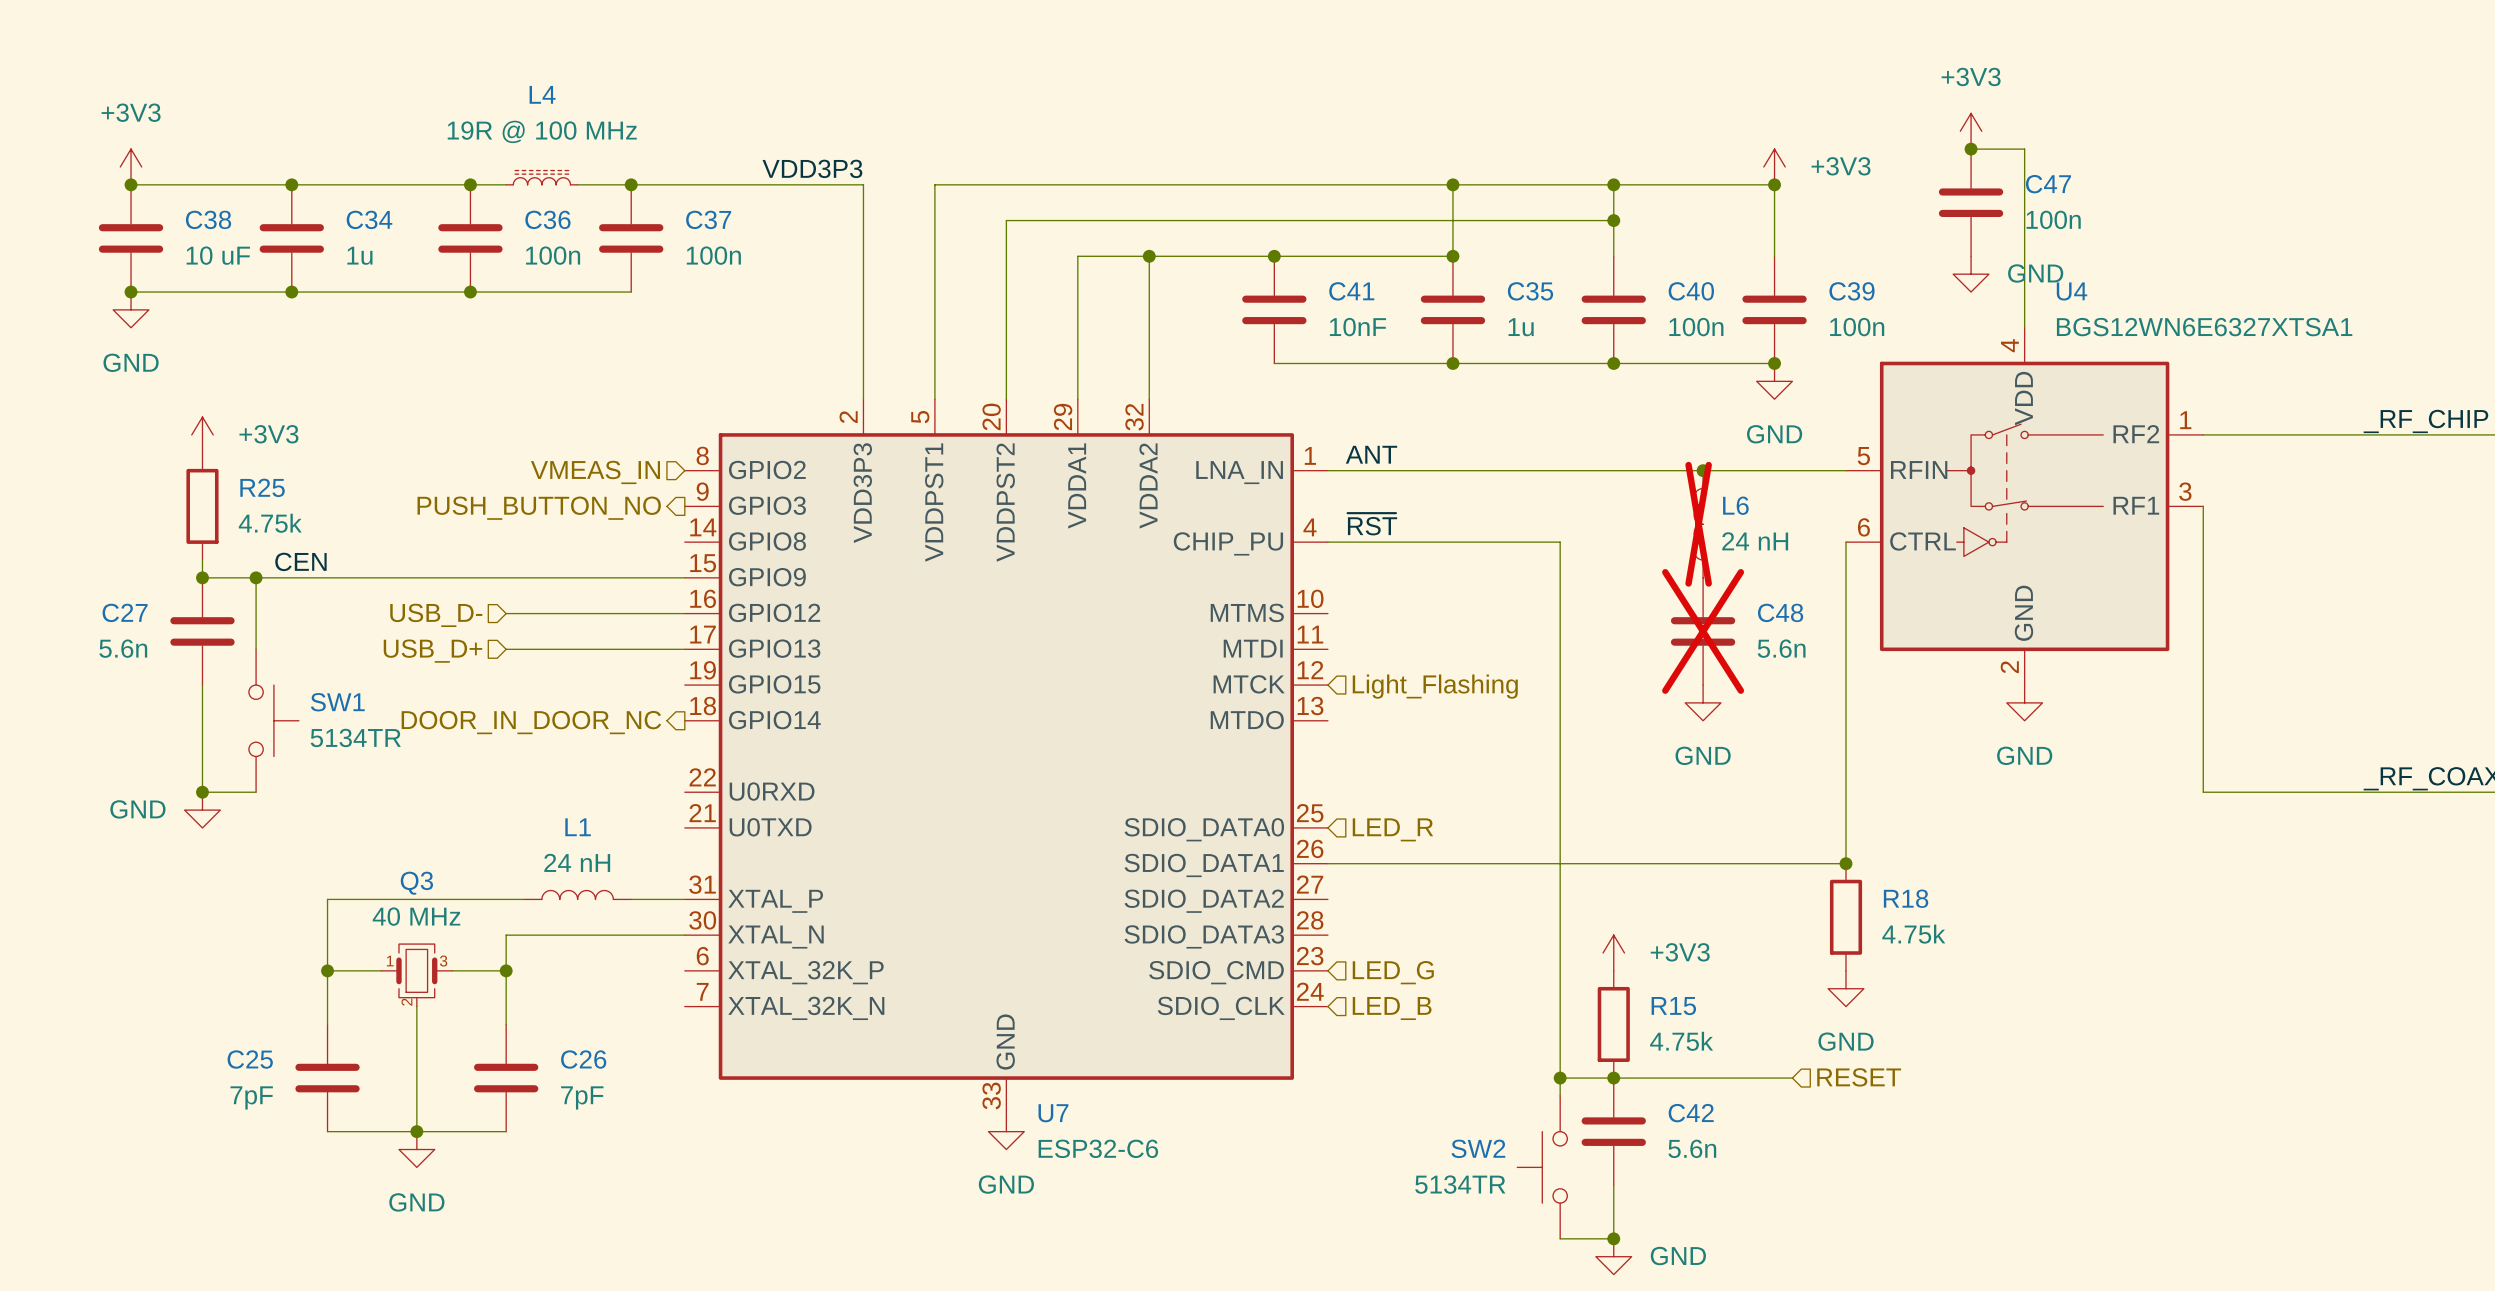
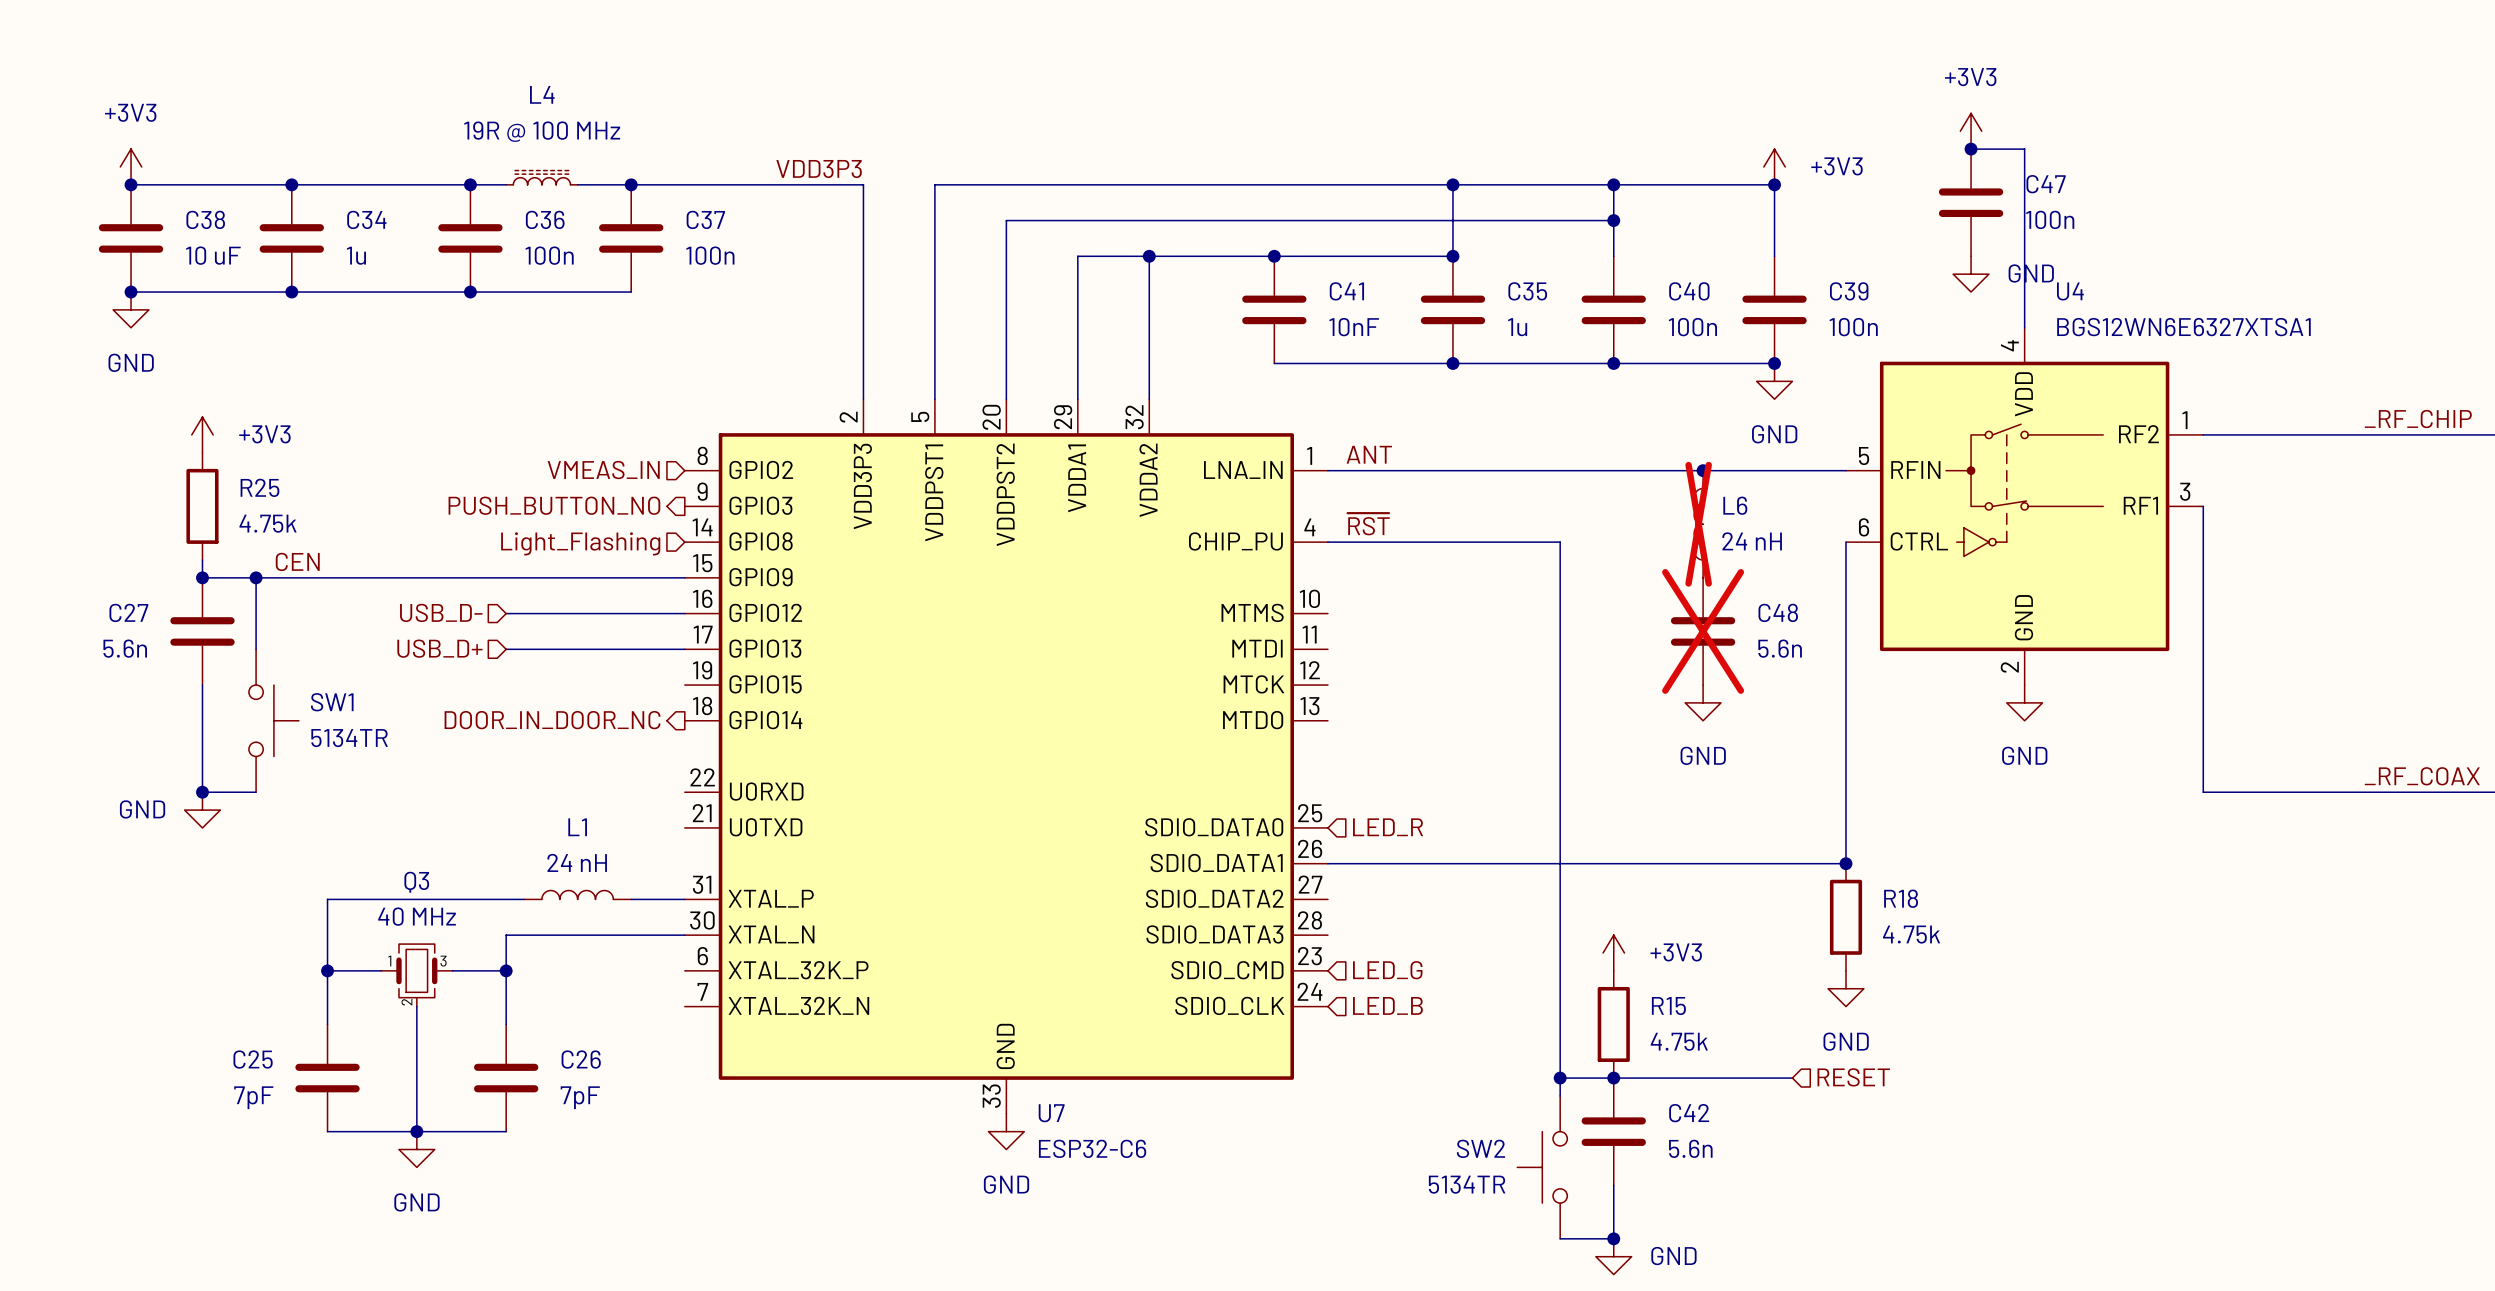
hierarchical label: none -> Light_Flashing (580, 543)
hierarchical label: Light_Flashing (1435, 686) -> none

